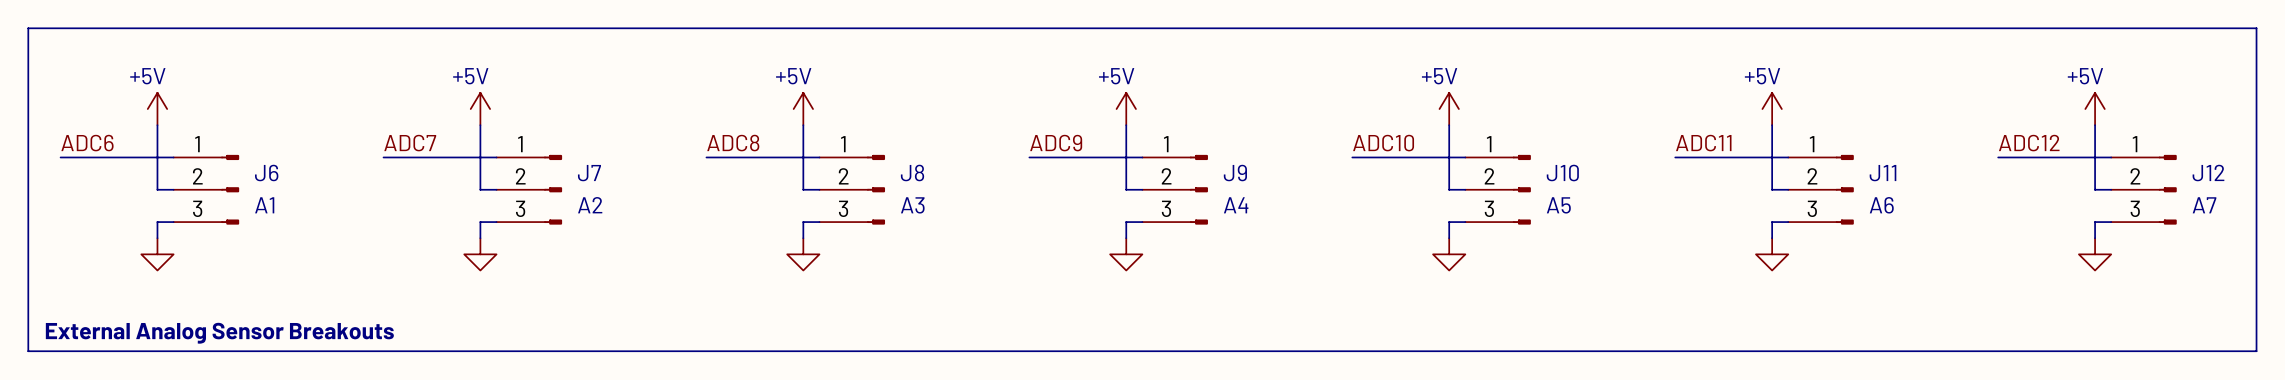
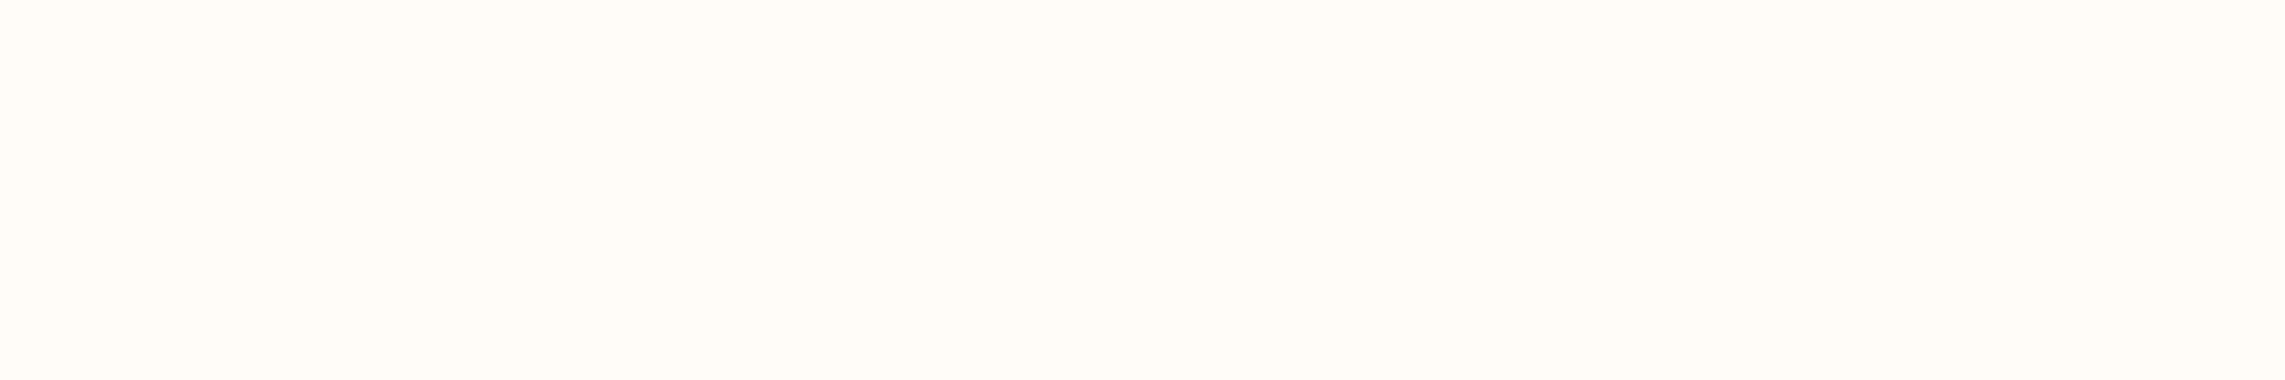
line: (28, 28) (2256, 28) (2256, 351) (28, 351) (28, 28) -> none
power symbol: +5V (157, 109) -> none
power symbol: +5V (480, 109) -> none
power symbol: +5V (803, 109) -> none
power symbol: +5V (1126, 109) -> none
power symbol: +5V (1449, 109) -> none
power symbol: +5V (1772, 109) -> none
power symbol: +5V (2095, 109) -> none
wire: (157, 125) (157, 189) (173, 189) -> none
wire: (480, 125) (480, 189) (496, 189) -> none
wire: (803, 125) (803, 189) (819, 189) -> none
wire: (1126, 125) (1126, 189) (1142, 189) -> none
wire: (1449, 125) (1449, 189) (1465, 189) -> none
wire: (1772, 125) (1772, 189) (1788, 189) -> none
wire: (2095, 125) (2095, 189) (2111, 189) -> none
label: ADC6 (87, 143) -> none
label: ADC7 (410, 143) -> none
label: ADC8 (733, 143) -> none
label: ADC9 (1056, 143) -> none
label: ADC10 (1383, 143) -> none
label: ADC11 (1703, 143) -> none
label: ADC12 (2029, 143) -> none
wire: (60, 157) (173, 157) -> none
wire: (383, 157) (496, 157) -> none
wire: (706, 157) (819, 157) -> none
wire: (1029, 157) (1142, 157) -> none
wire: (1352, 157) (1465, 157) -> none
wire: (1675, 157) (1788, 157) -> none
wire: (1998, 157) (2111, 157) -> none
J6: A1 (206, 189) -> none
J7: A2 (529, 189) -> none
J8: A3 (852, 189) -> none
J9: A4 (1175, 189) -> none
J10: A5 (1498, 189) -> none
J11: A6 (1821, 189) -> none
J12: A7 (2143, 189) -> none
wire: (173, 222) (157, 222) (157, 238) -> none
wire: (496, 222) (480, 222) (480, 238) -> none
wire: (819, 222) (803, 222) (803, 238) -> none
wire: (1142, 222) (1126, 222) (1126, 238) -> none
wire: (1465, 222) (1449, 222) (1449, 238) -> none
wire: (1788, 222) (1772, 222) (1772, 238) -> none
wire: (2111, 222) (2095, 222) (2095, 238) -> none
power symbol: (157, 254) -> none
power symbol: (480, 254) -> none
power symbol: (803, 254) -> none
power symbol: (1126, 254) -> none
power symbol: (1449, 254) -> none
power symbol: (1772, 254) -> none
power symbol: (2095, 254) -> none
text: External Analog Sensor Breakouts (219, 333) -> none

